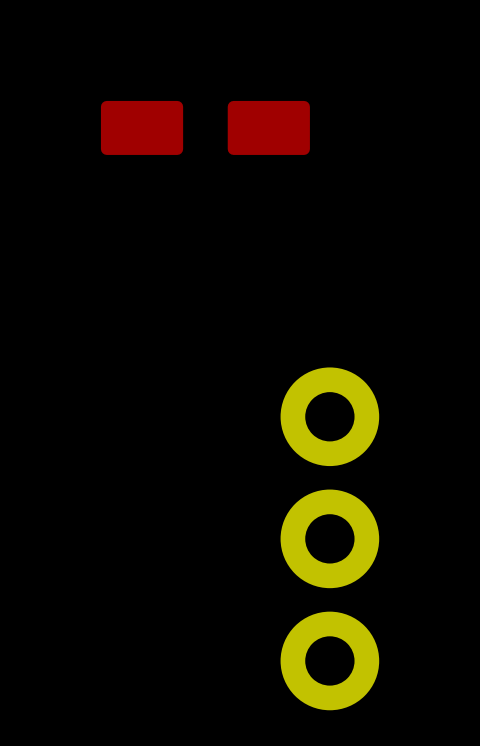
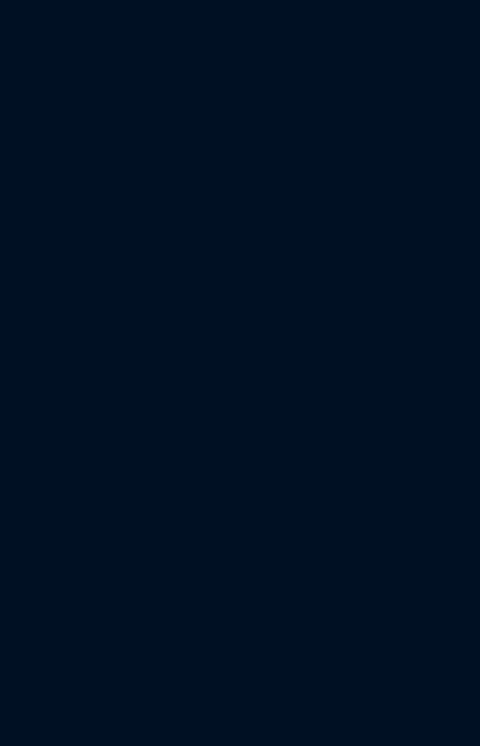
part: (205, 127) -> none
part: (329, 416) -> none
part: (329, 538) -> none
part: (329, 660) -> none

